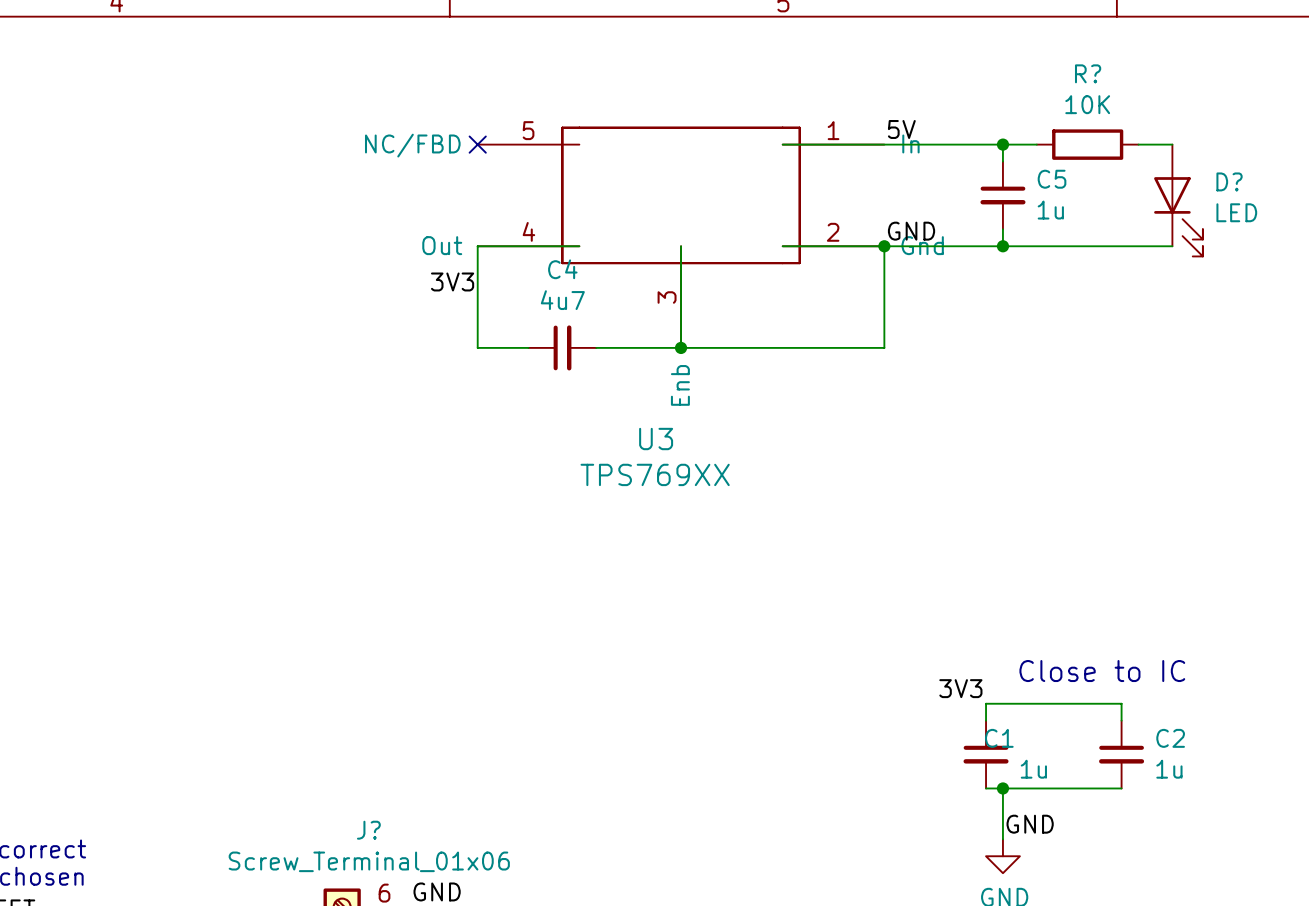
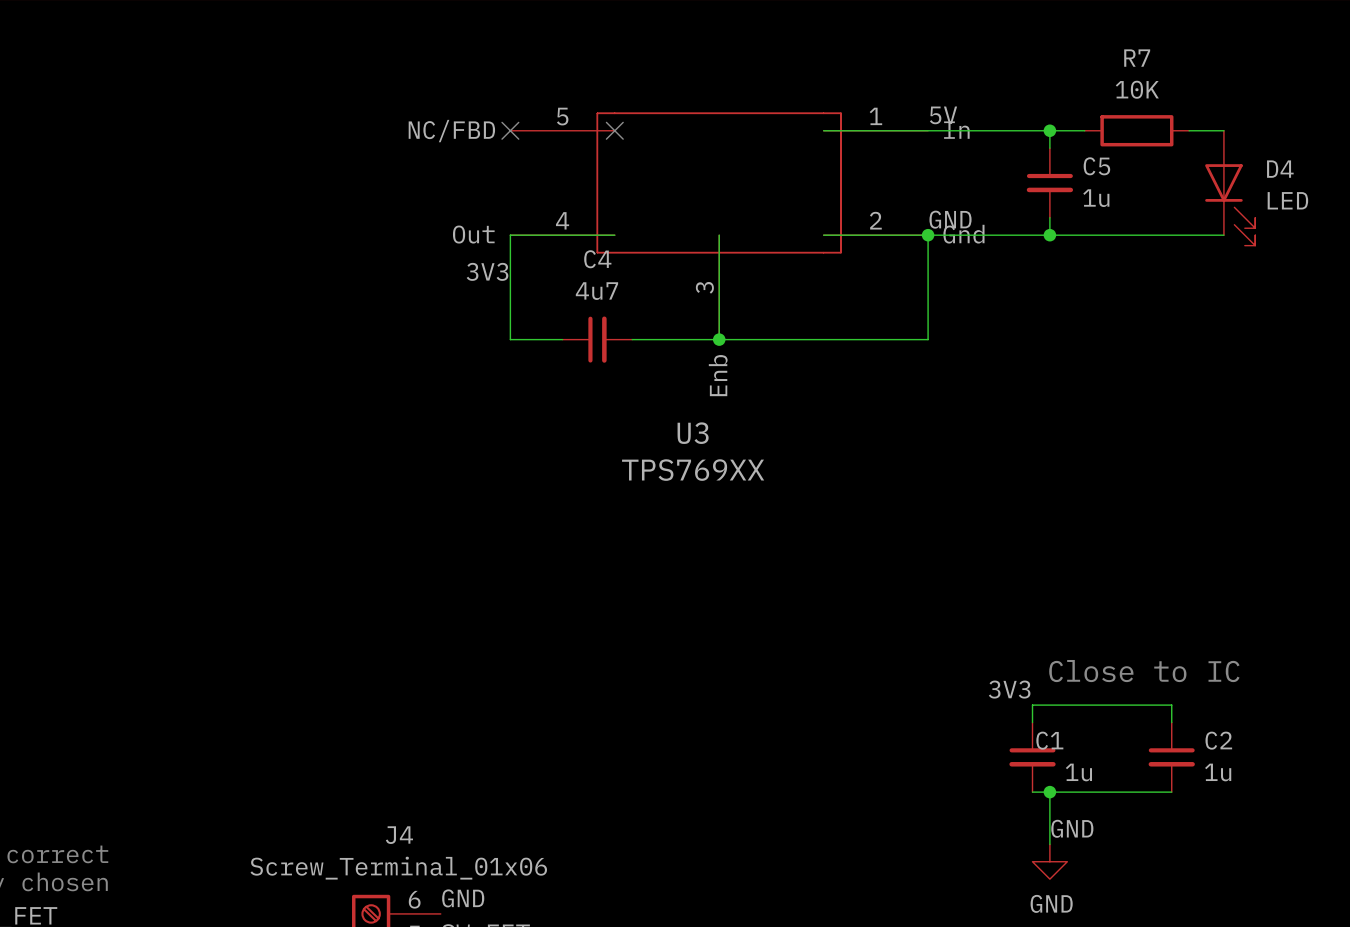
R? name: R? (1088, 73) -> R7 (1137, 58)
no-connect mark: none -> (614, 130)
D? name: D? (1229, 181) -> D4 (1280, 169)
J? name: J? (368, 830) -> J4 (399, 835)

